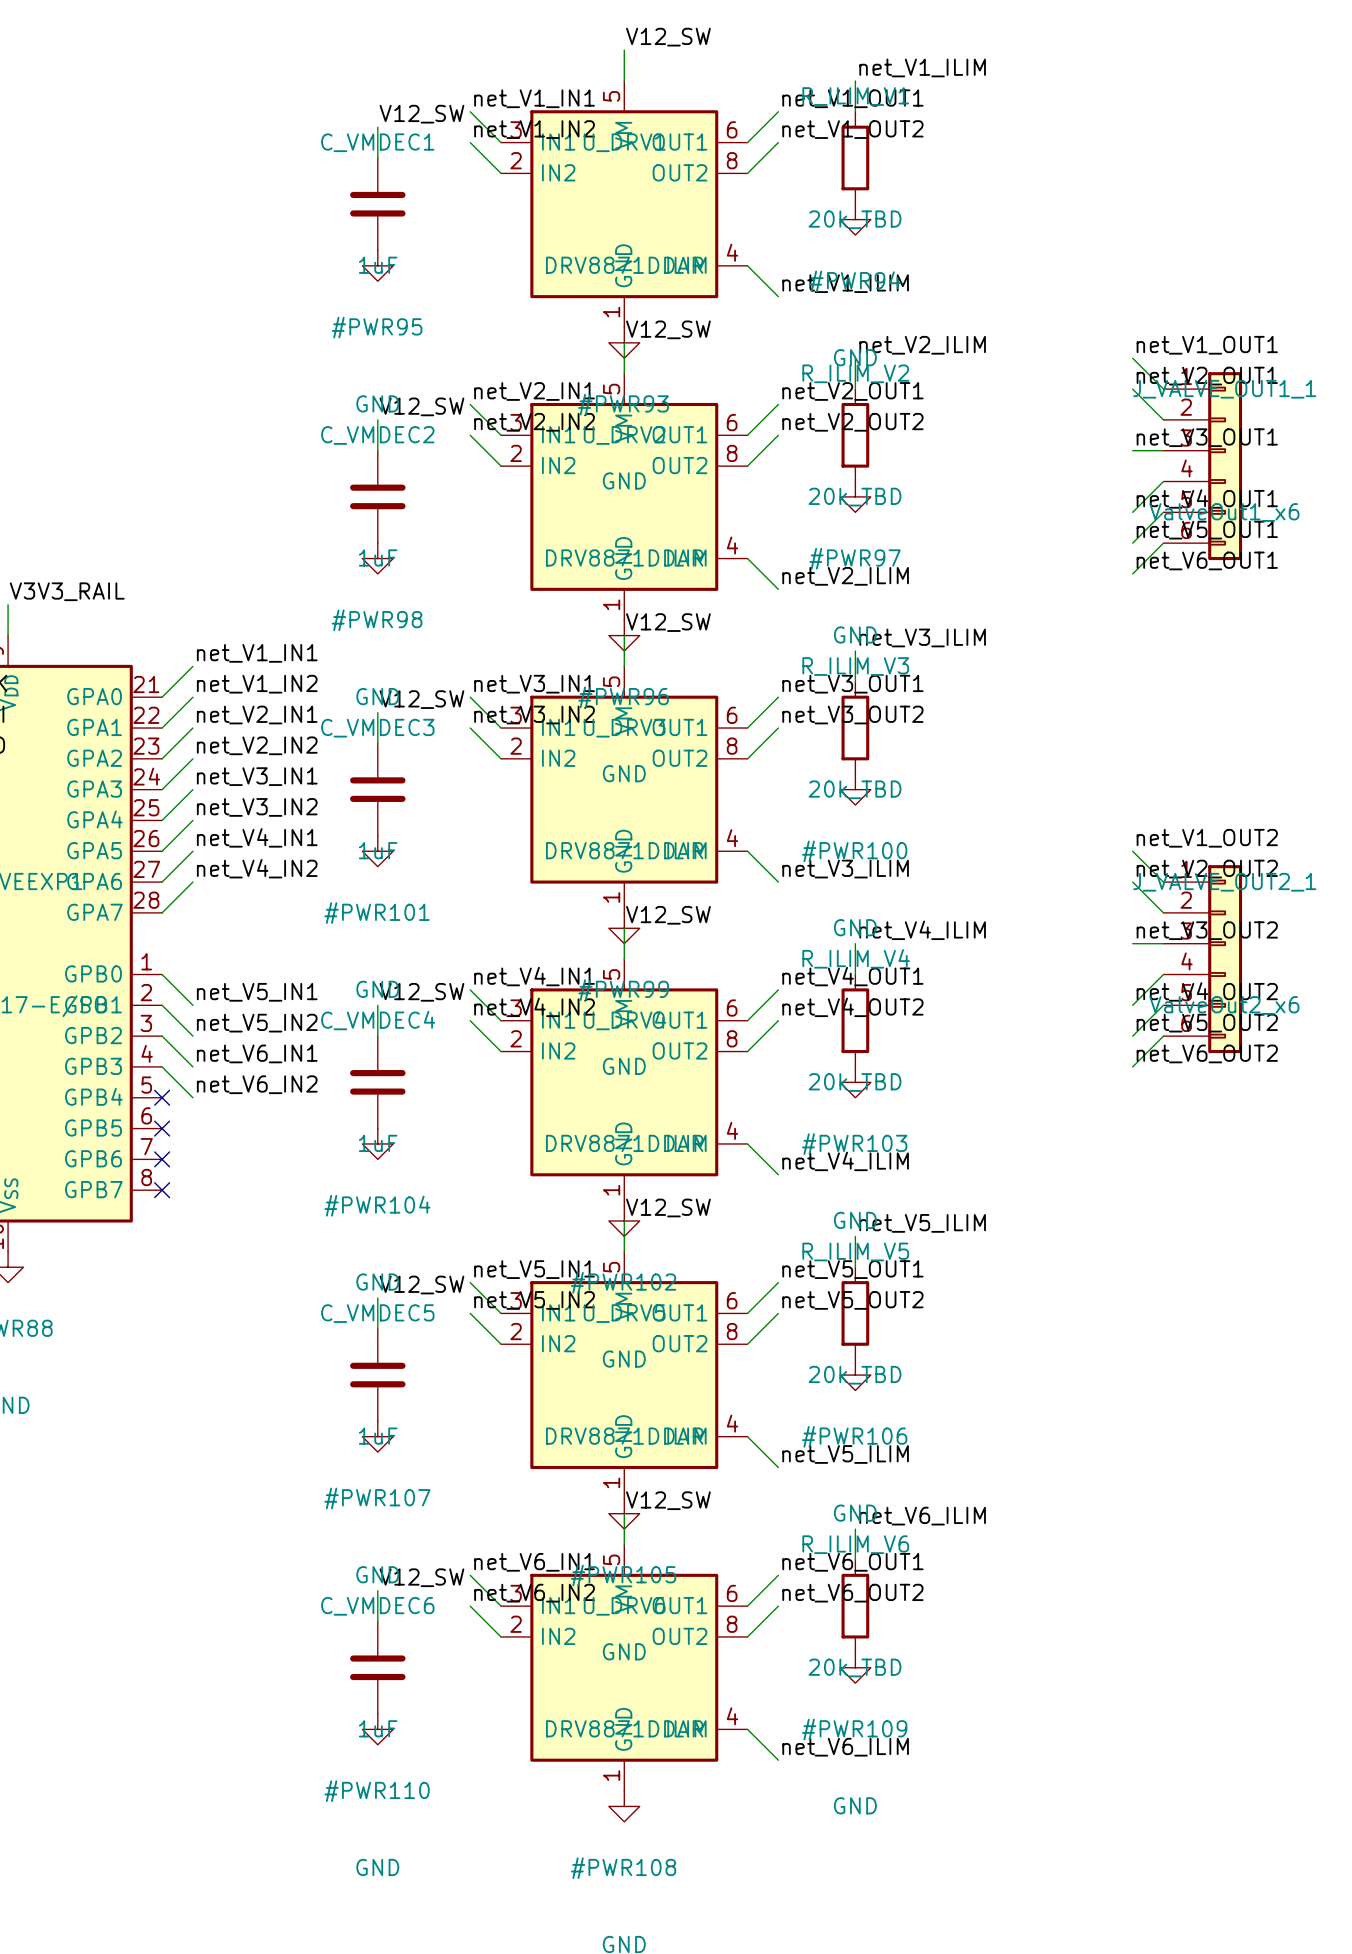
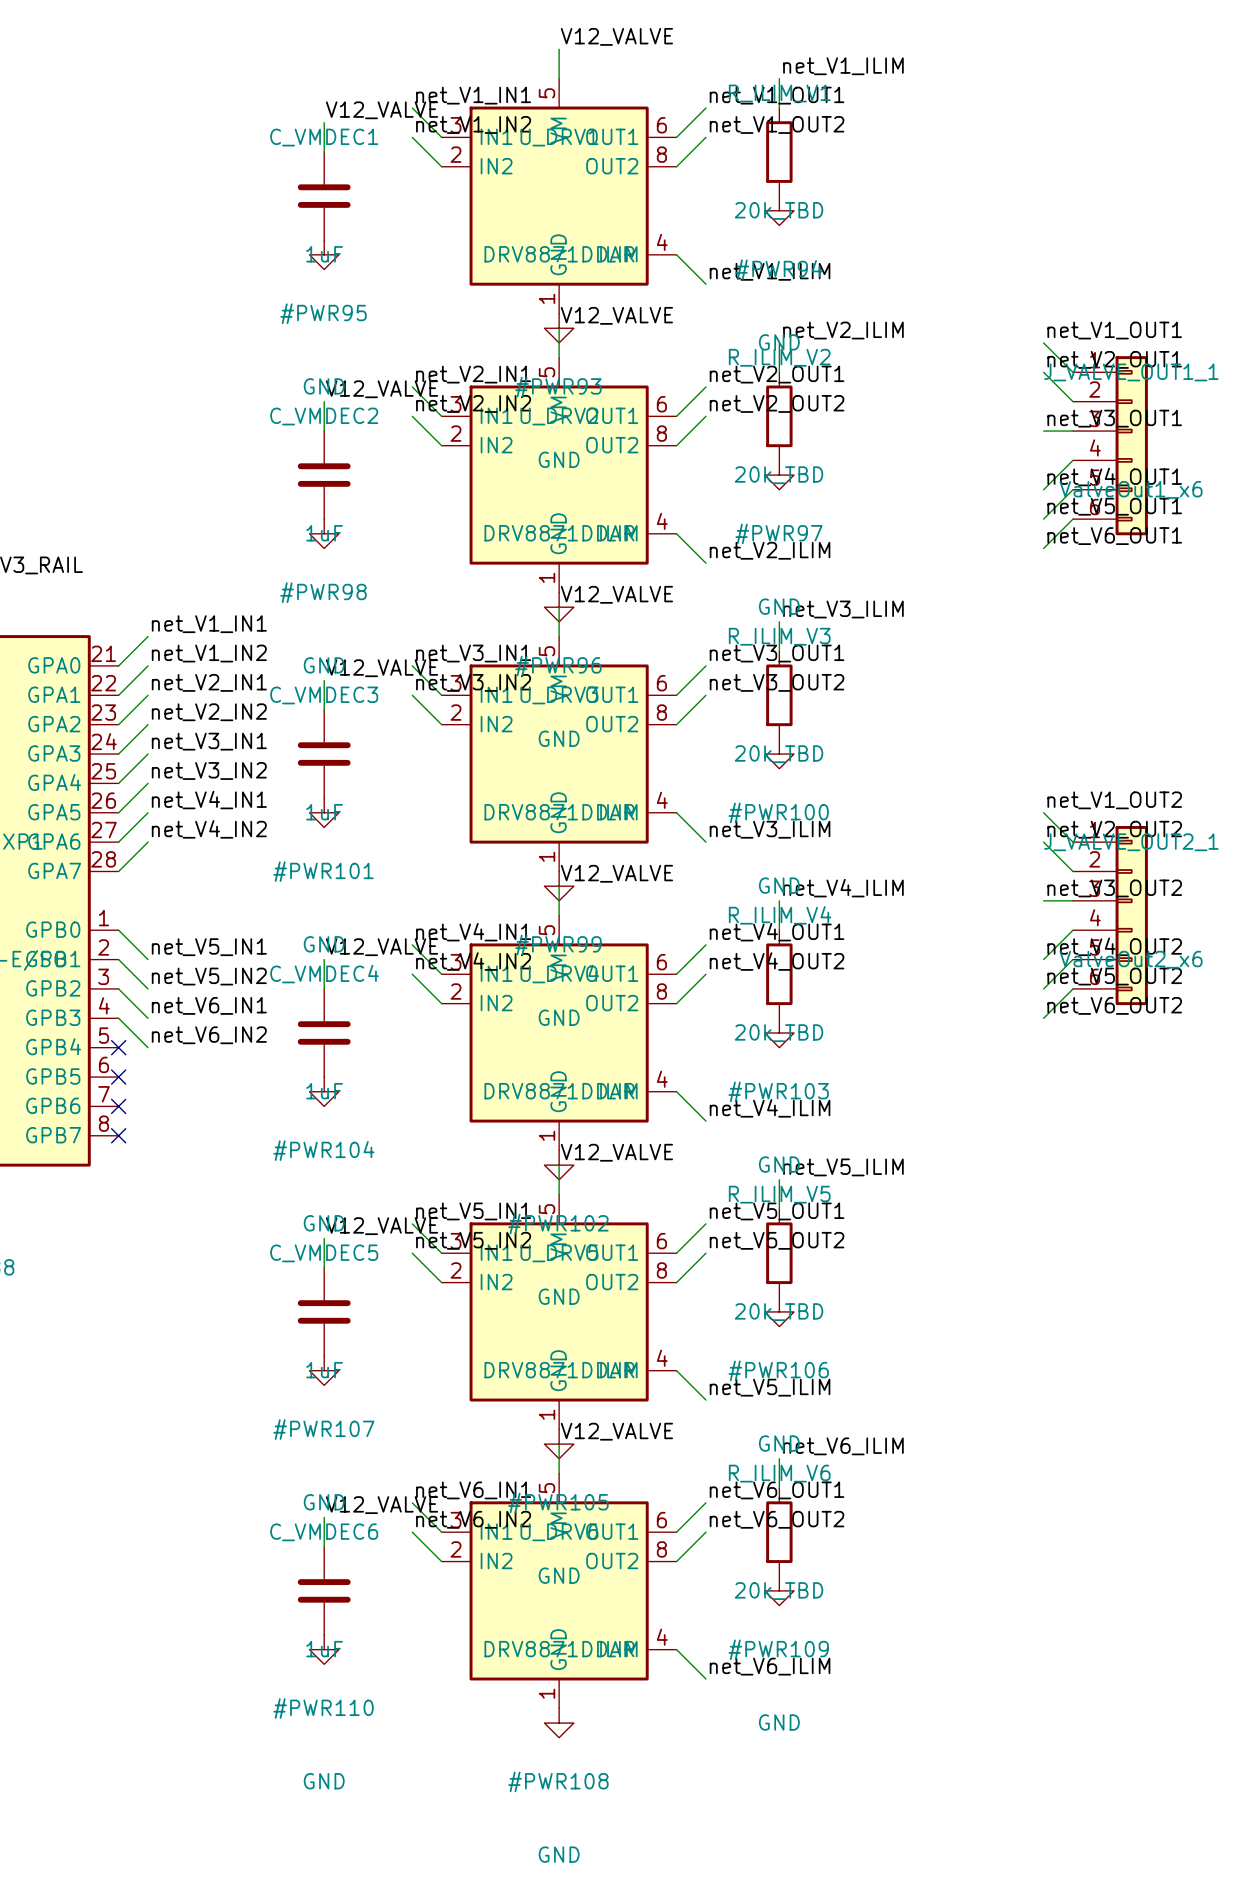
label: V12_SW (668, 37) -> V12_VALVE (616, 36)
label: V12_SW (421, 114) -> V12_VALVE (382, 110)
label: V12_SW (668, 329) -> V12_VALVE (616, 315)
label: V12_SW (421, 406) -> V12_VALVE (382, 389)
label: V12_SW (668, 622) -> V12_VALVE (616, 594)
label: V12_SW (421, 699) -> V12_VALVE (382, 668)
label: V12_SW (668, 915) -> V12_VALVE (616, 873)
label: V12_SW (421, 992) -> V12_VALVE (382, 947)
label: V12_SW (668, 1207) -> V12_VALVE (616, 1152)
label: V12_SW (421, 1285) -> V12_VALVE (382, 1226)
label: V12_SW (668, 1500) -> V12_VALVE (616, 1431)
label: V12_SW (421, 1577) -> V12_VALVE (382, 1505)

